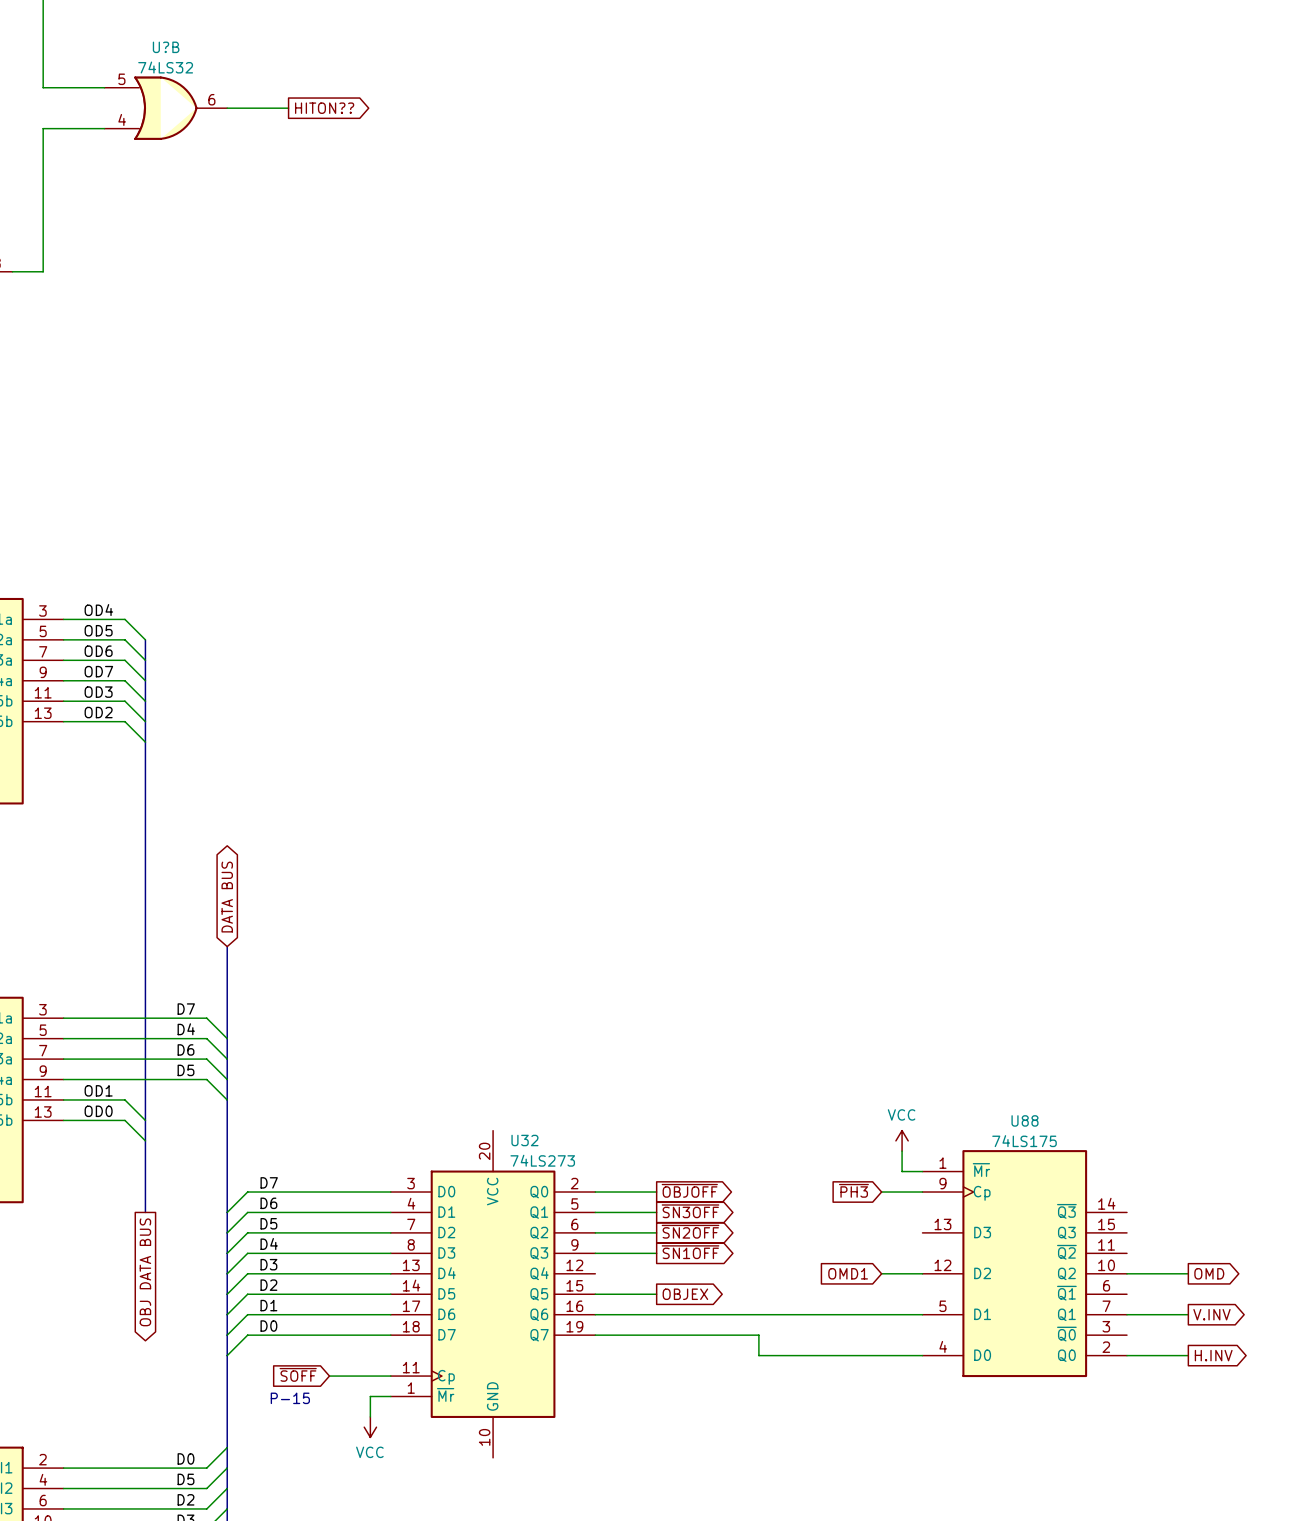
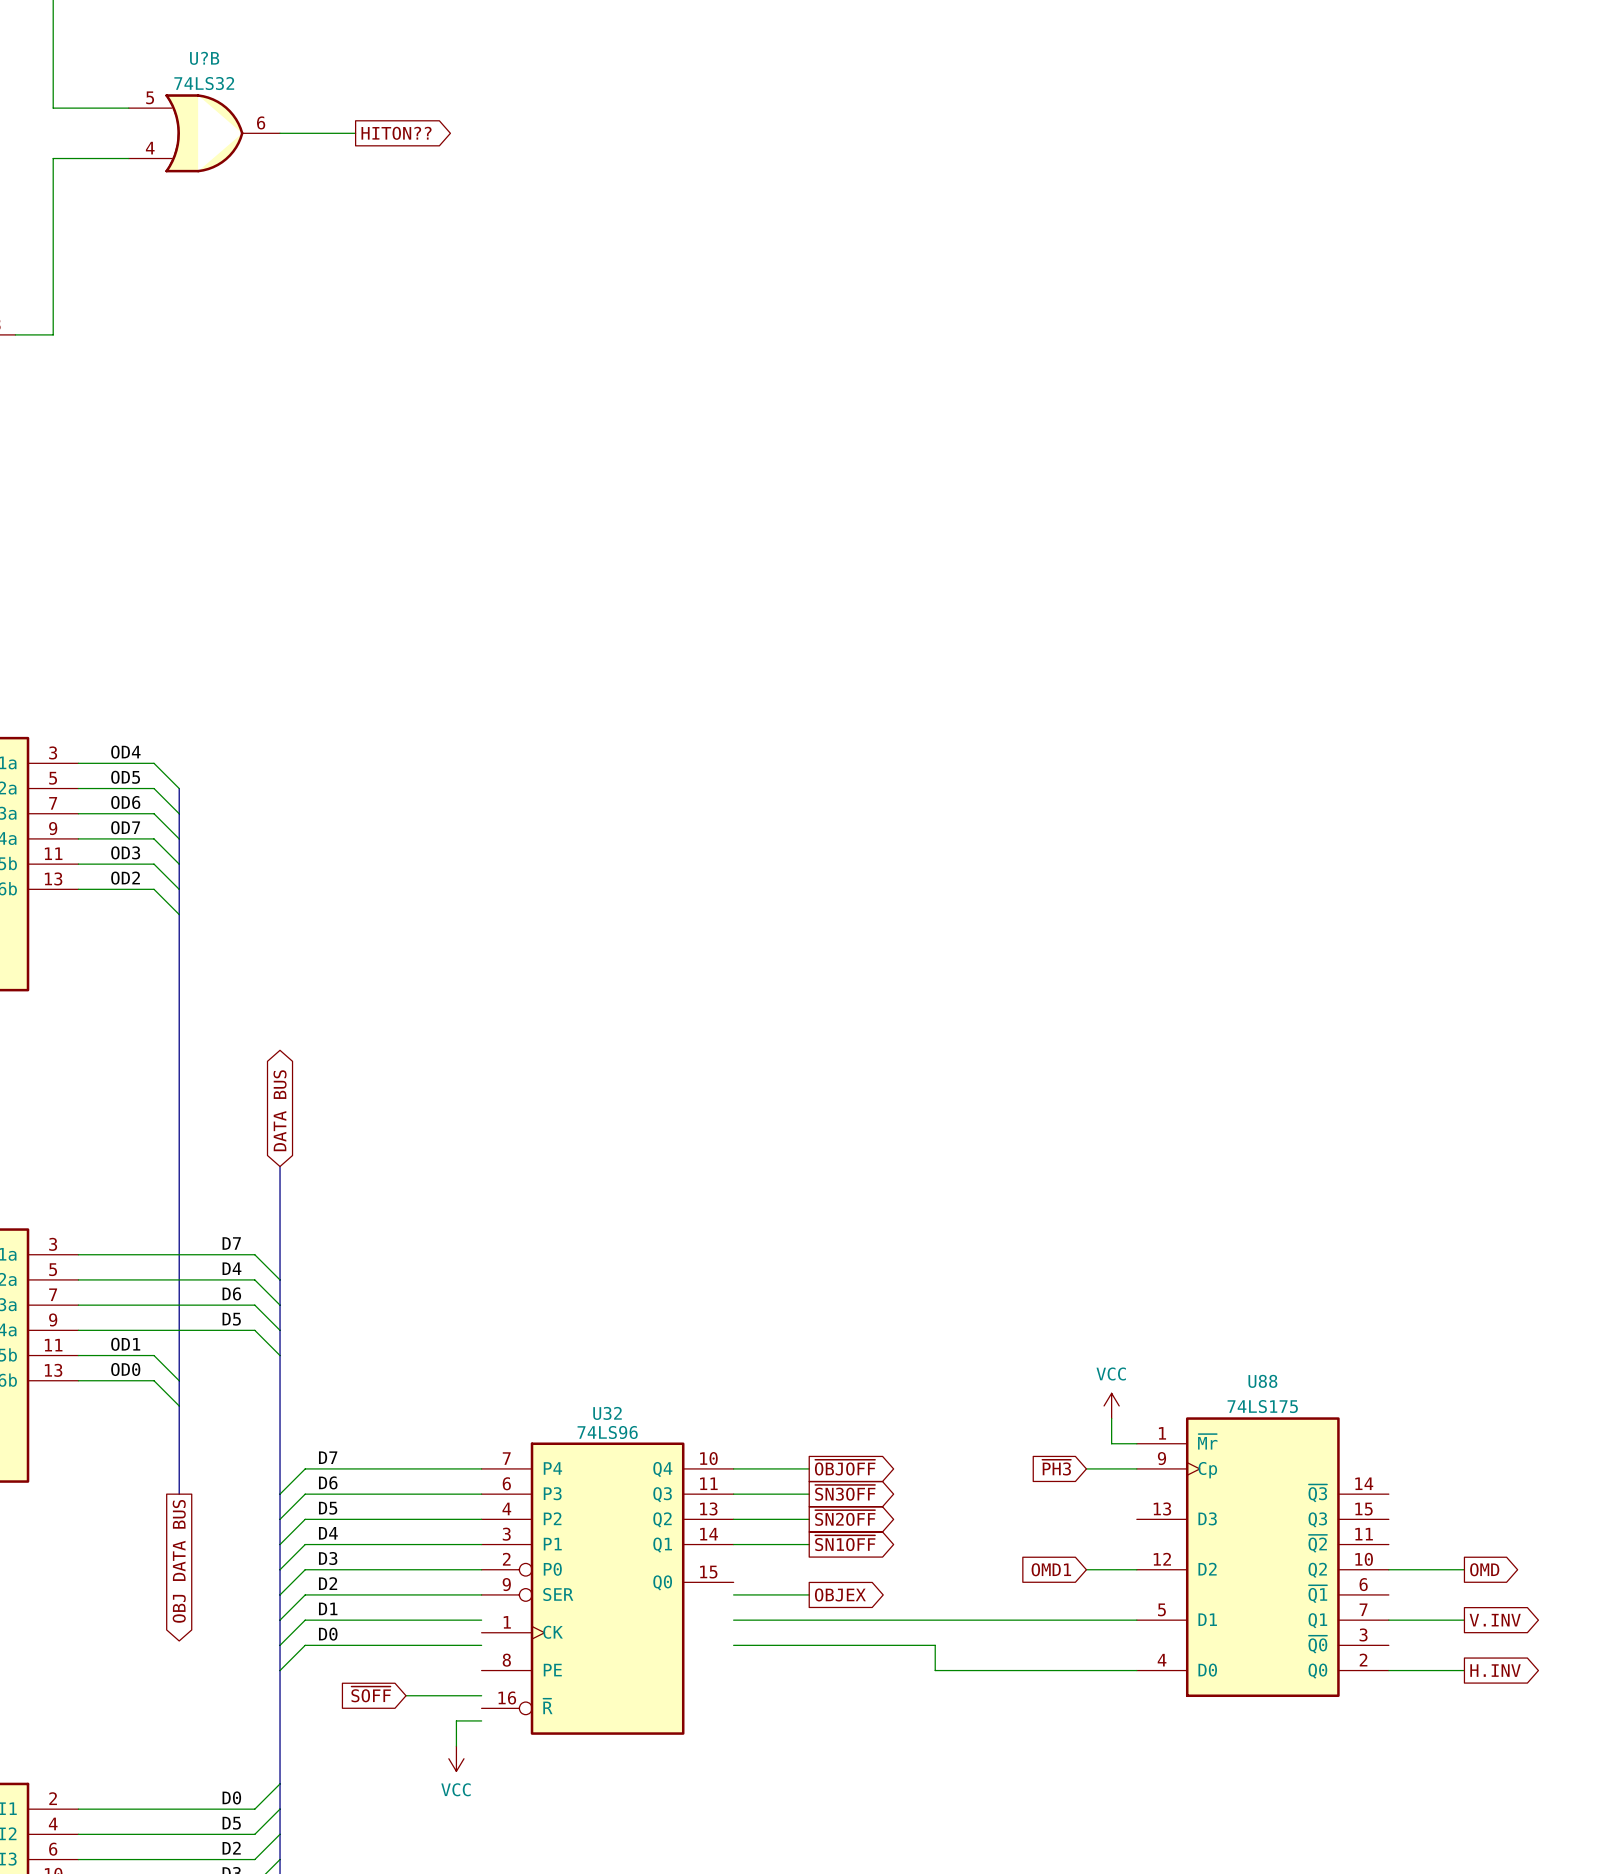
U32 symbol: [390, 1130, 596, 1458] -> [481, 1442, 734, 1735]
U32 name position: U32 (524, 1140) -> U32 (607, 1413)
U32 value: 74LS273 (542, 1160) -> 74LS96 (607, 1432)
text: P-15 (290, 1398) -> none

